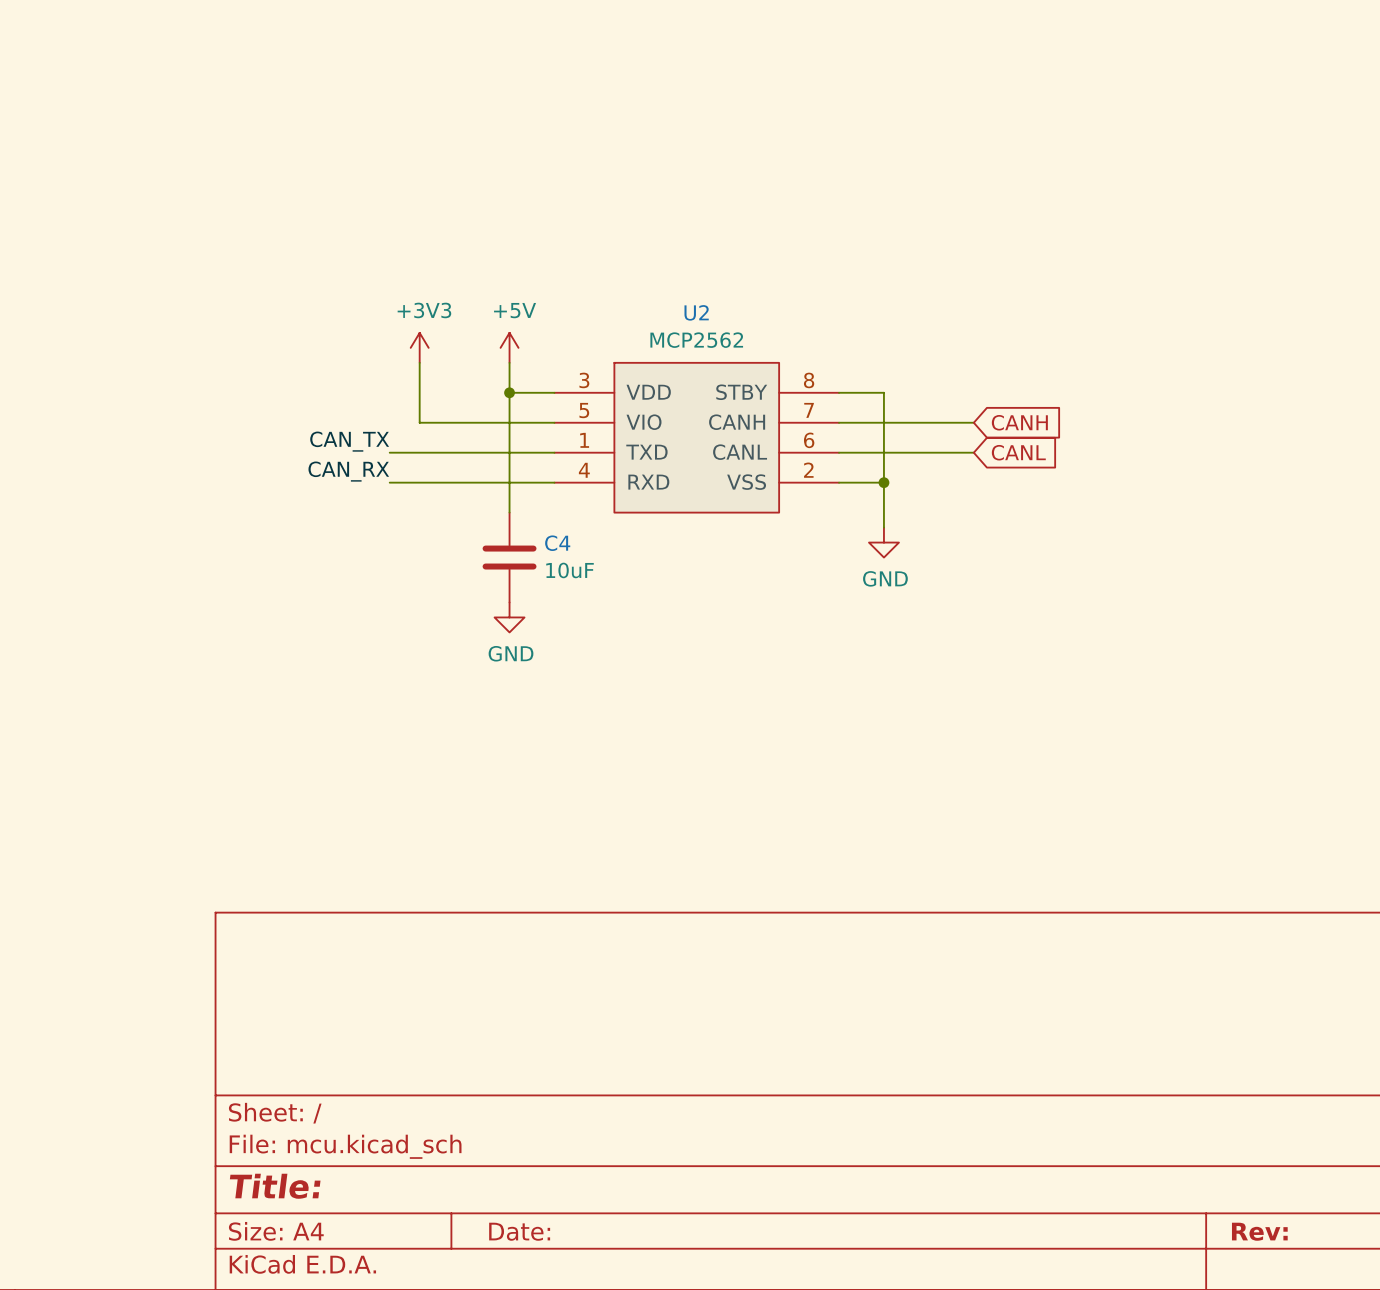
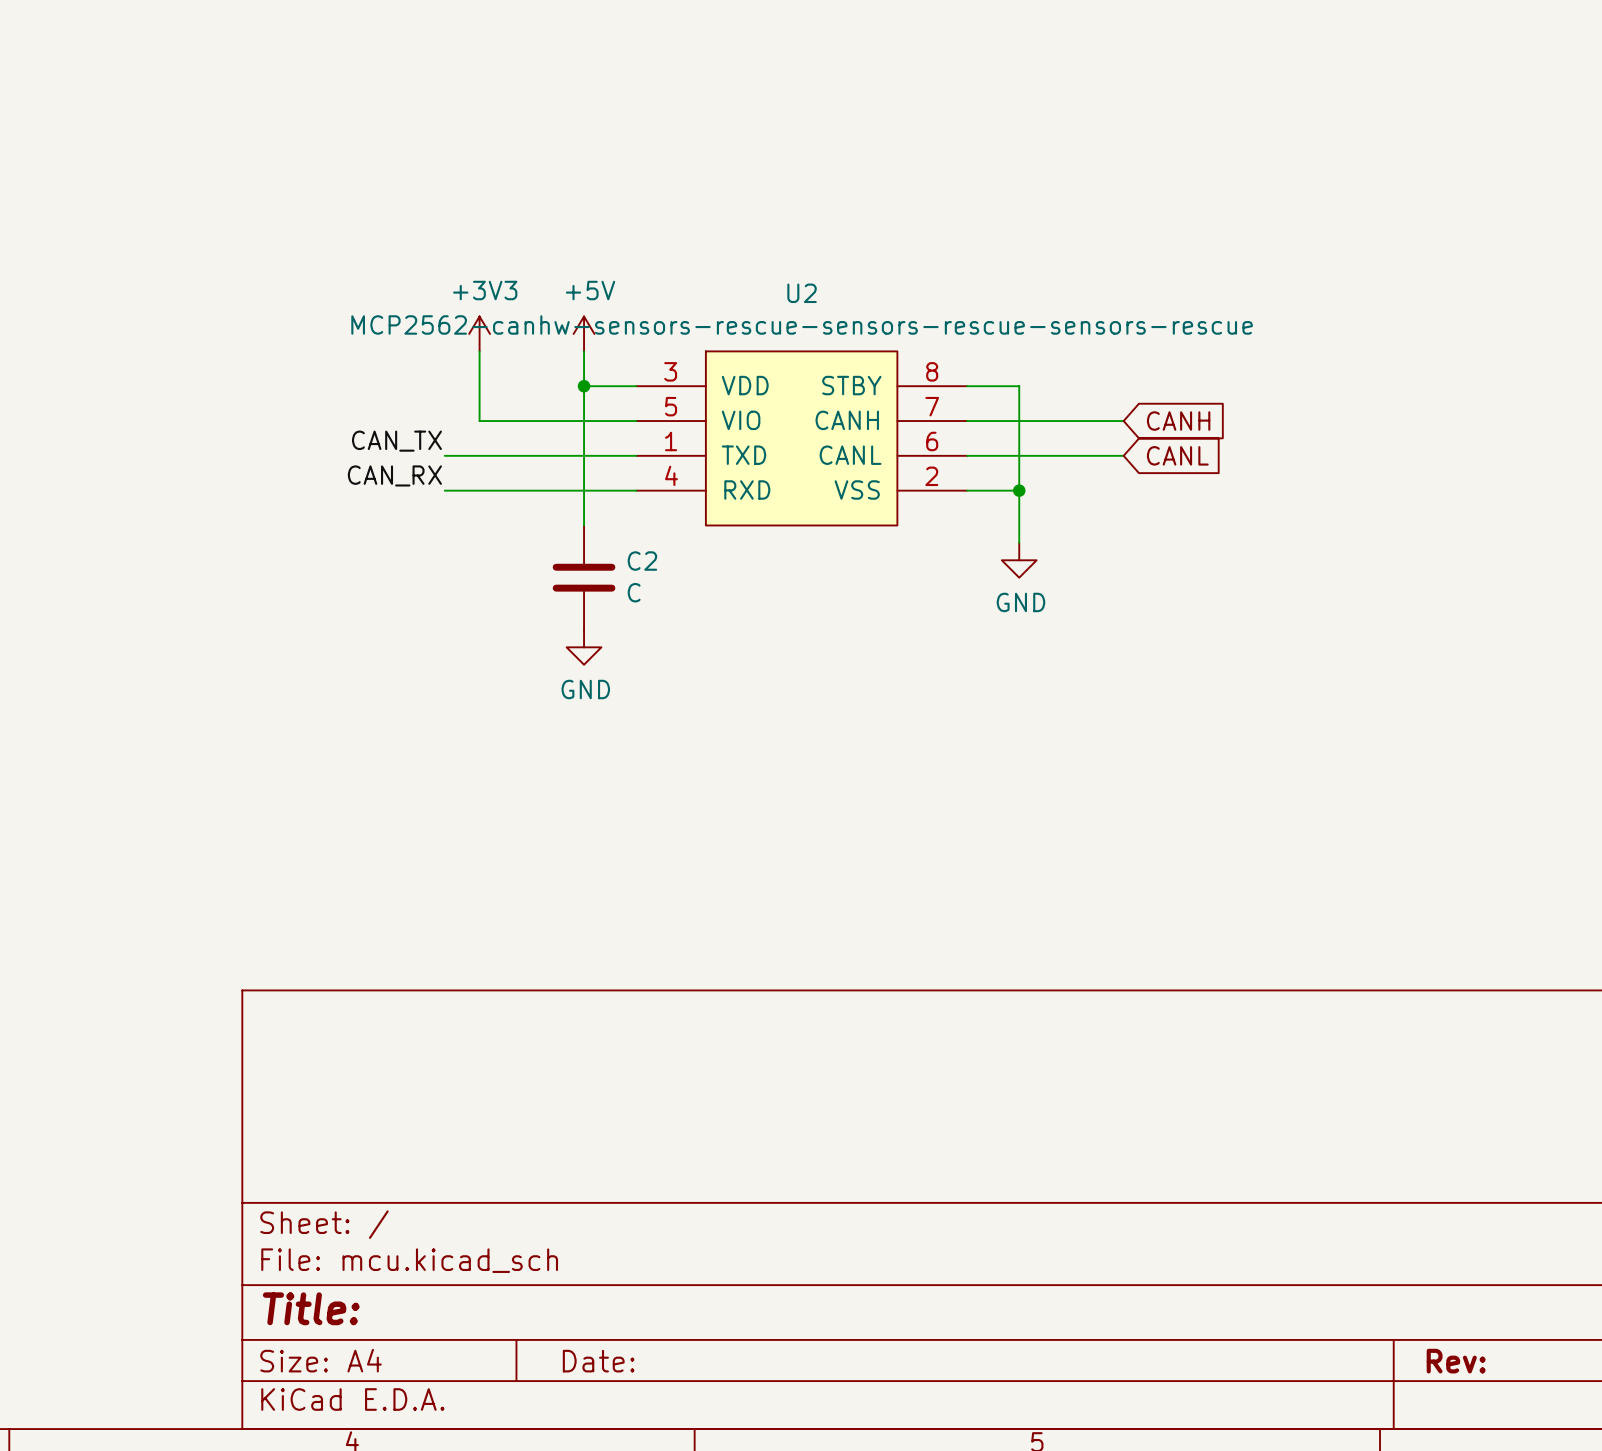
U2 value: MCP2562 (696, 340) -> MCP2562-canhw-sensors-rescue-sensors-rescue-sensors-rescue (802, 324)
C4 name: C4 (557, 543) -> C2 (642, 561)
C4 value: 10uF (570, 570) -> C (634, 592)

